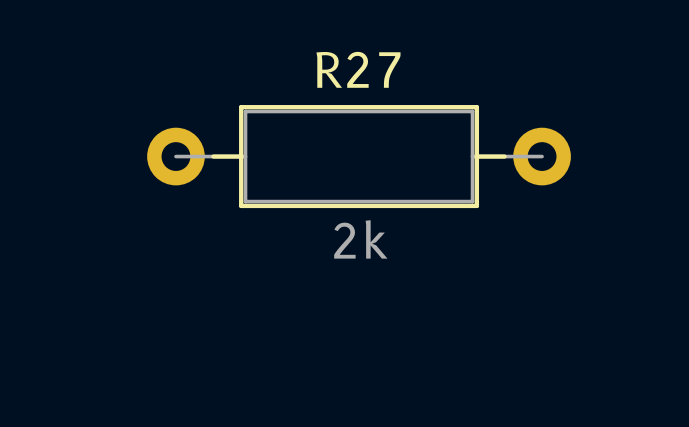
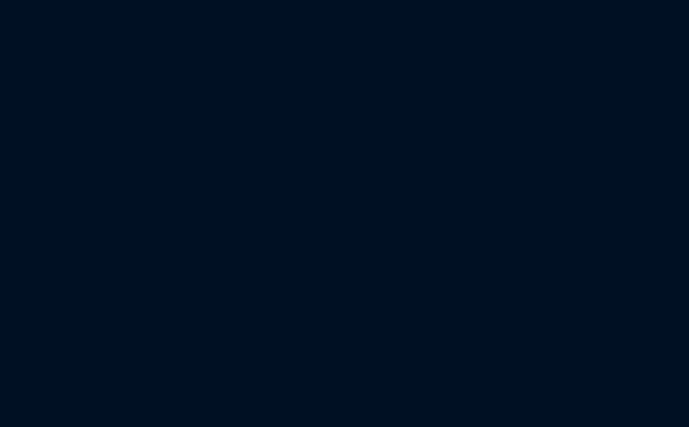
R27: 2k (359, 156) -> none

